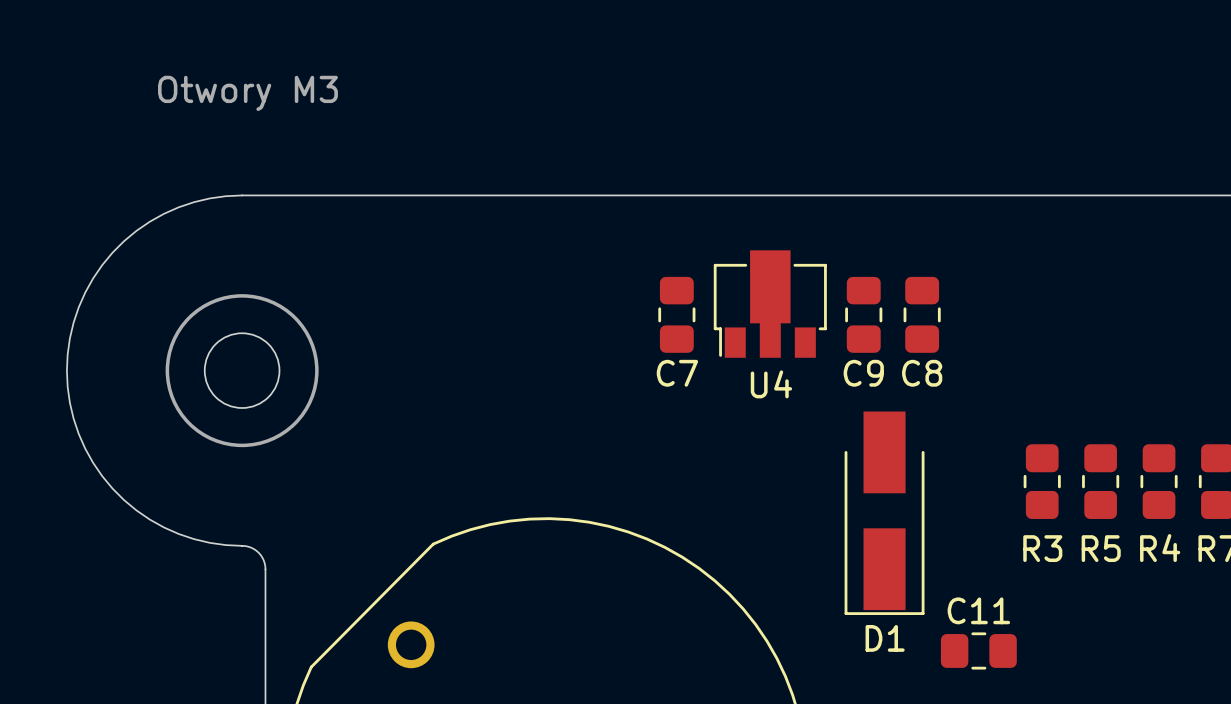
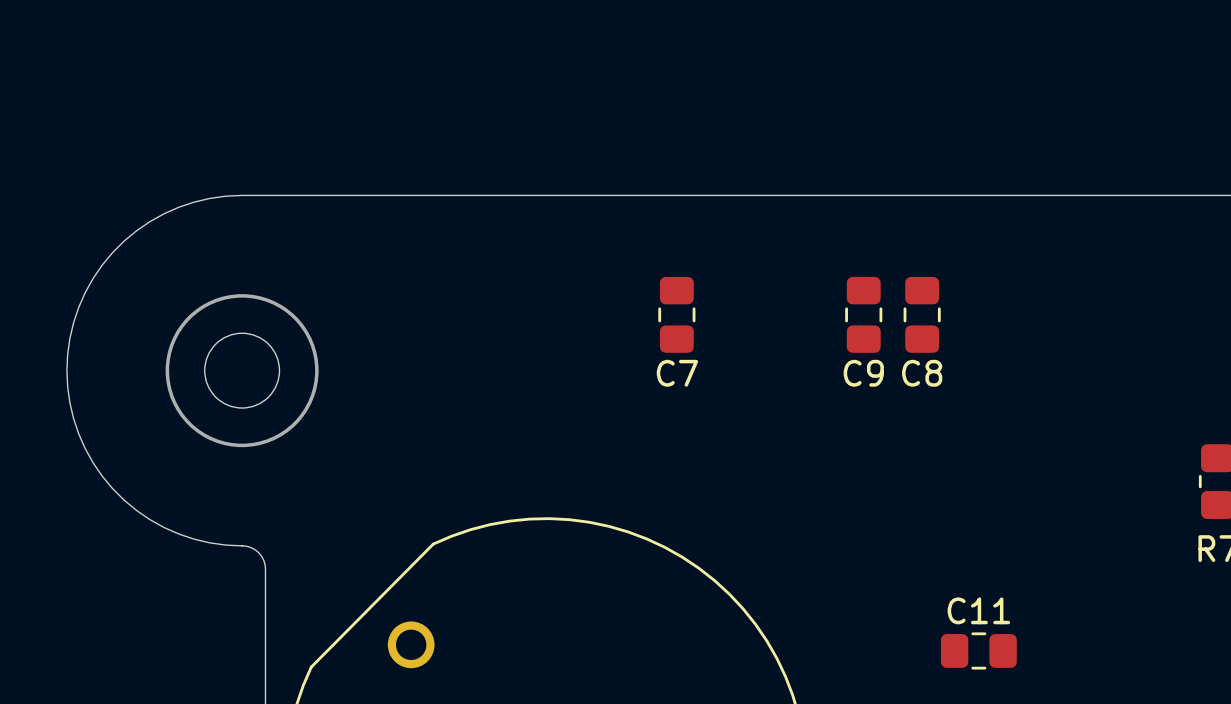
text: Otwory M3 (247, 93) -> none
U4: (770, 304) -> none
R3: (1042, 481) -> none
R5: (1100, 481) -> none
R4: (1159, 481) -> none
D1: (884, 513) -> none

